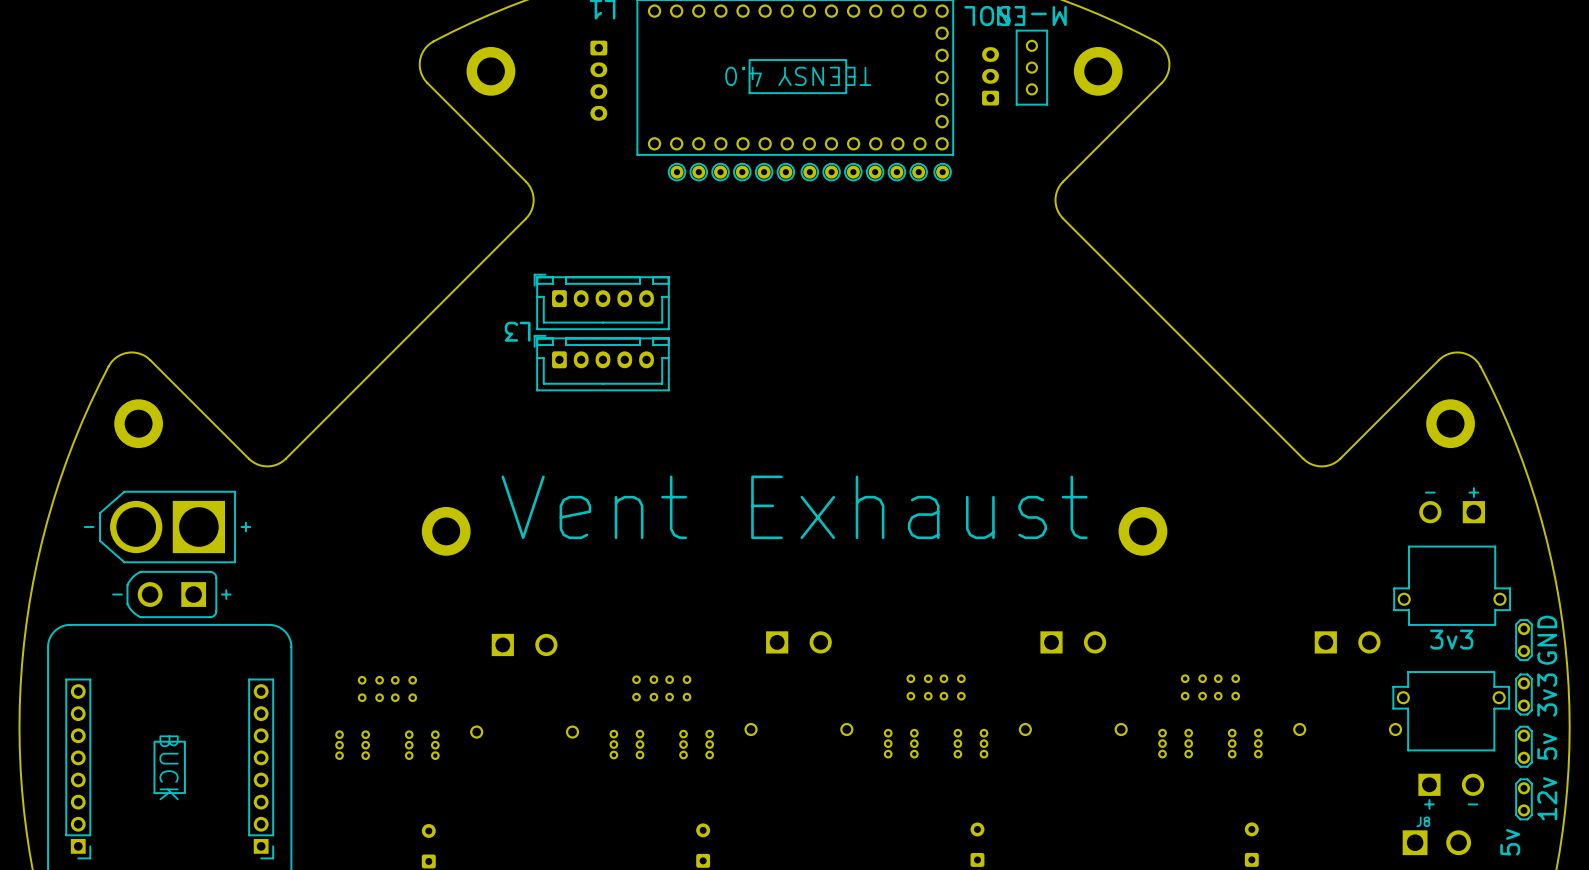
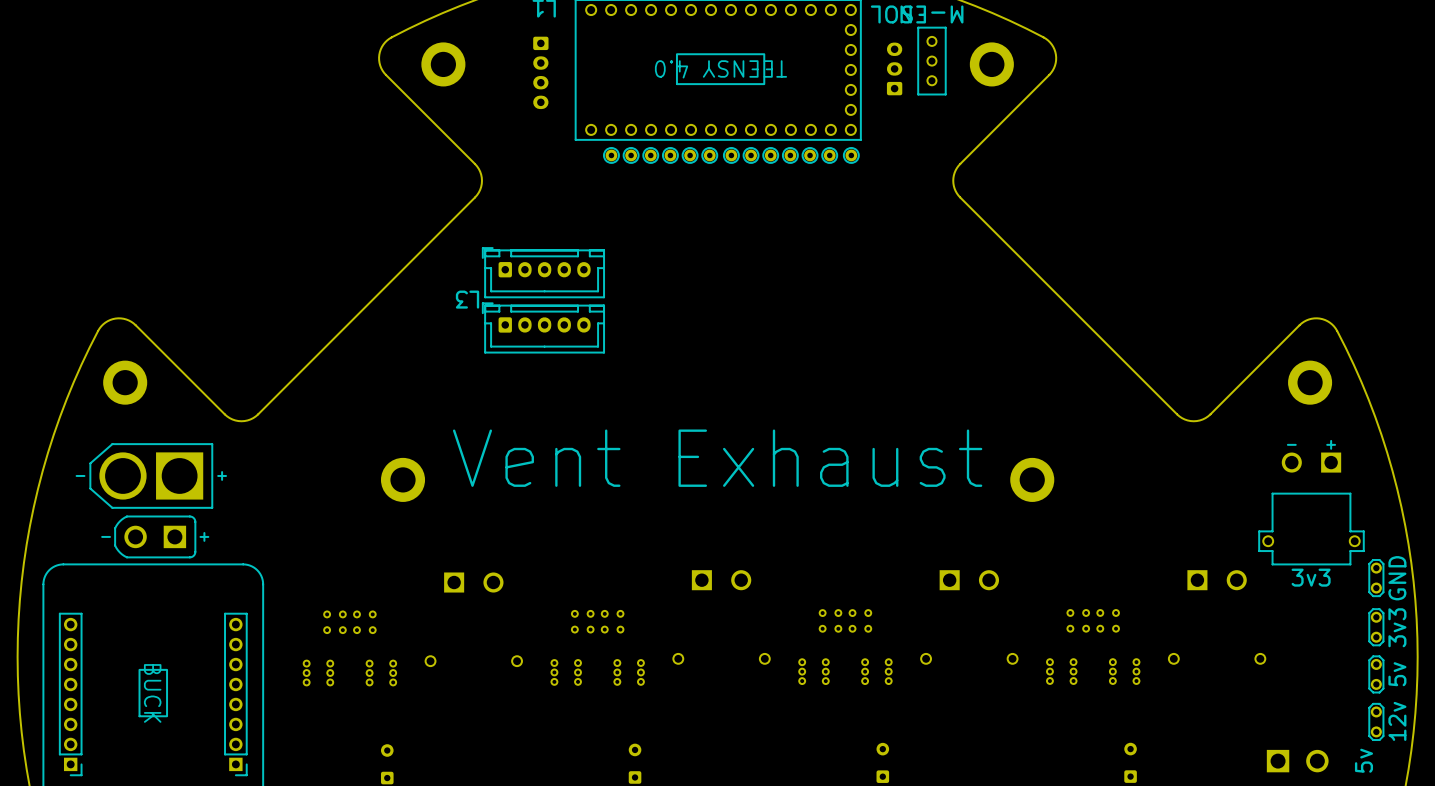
J8: (1451, 740) -> none

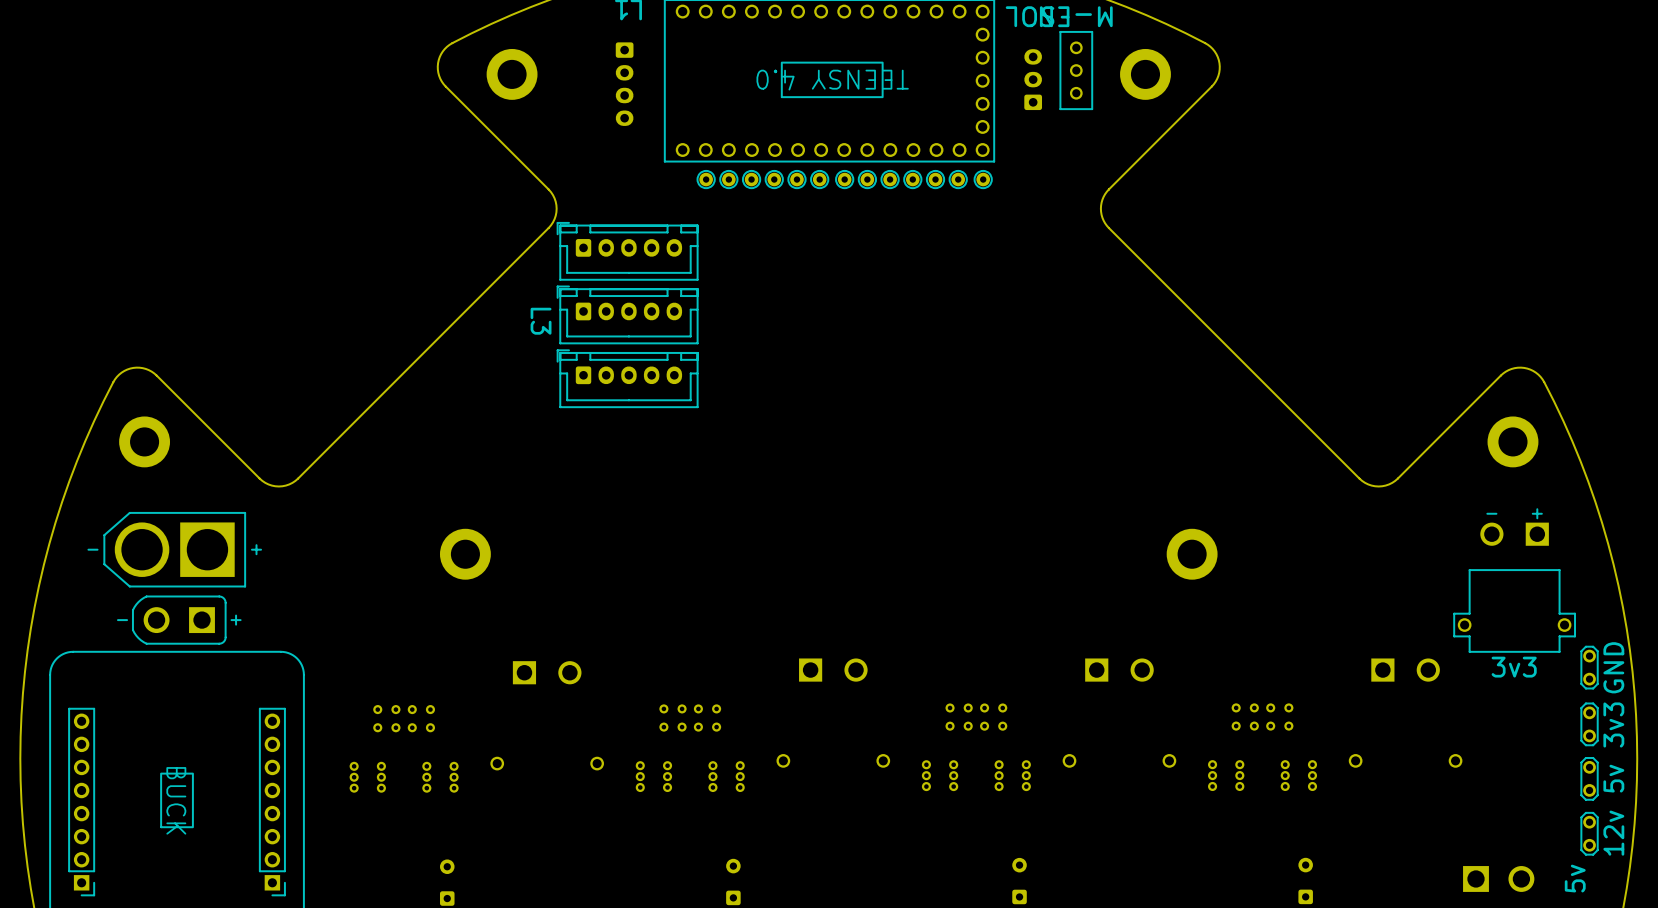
part: none -> (627, 251)
text rotation: 0° (467, 299) -> 90° counterclockwise (541, 321)
text: Vent Exhaust (717, 458) -> none

